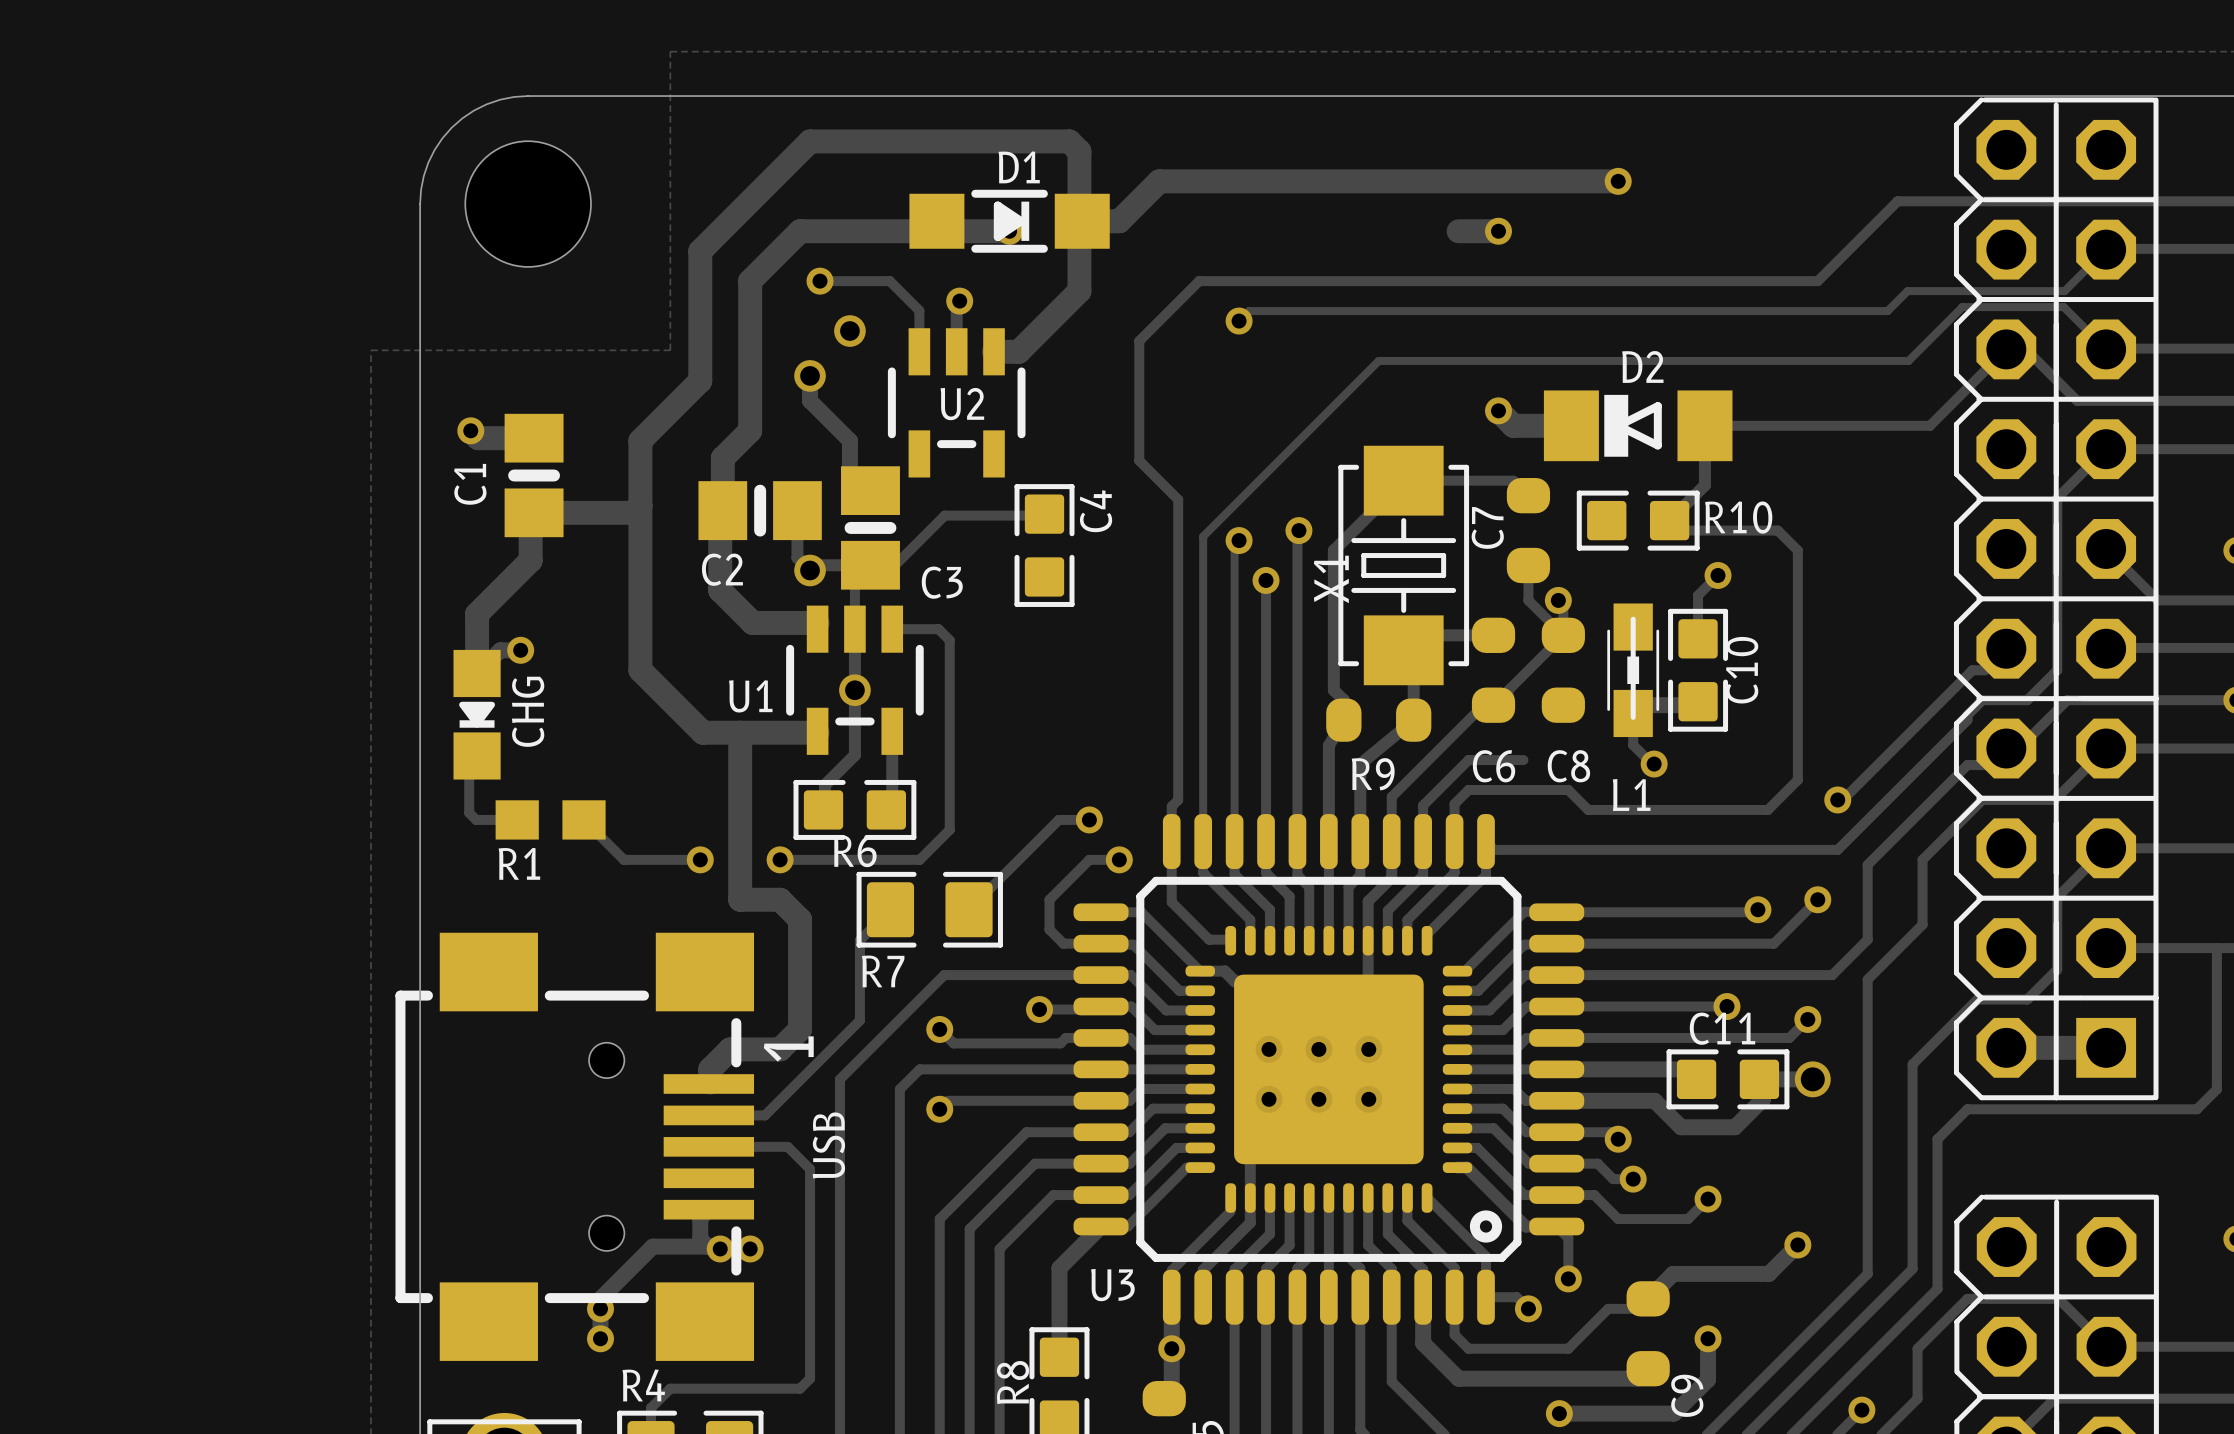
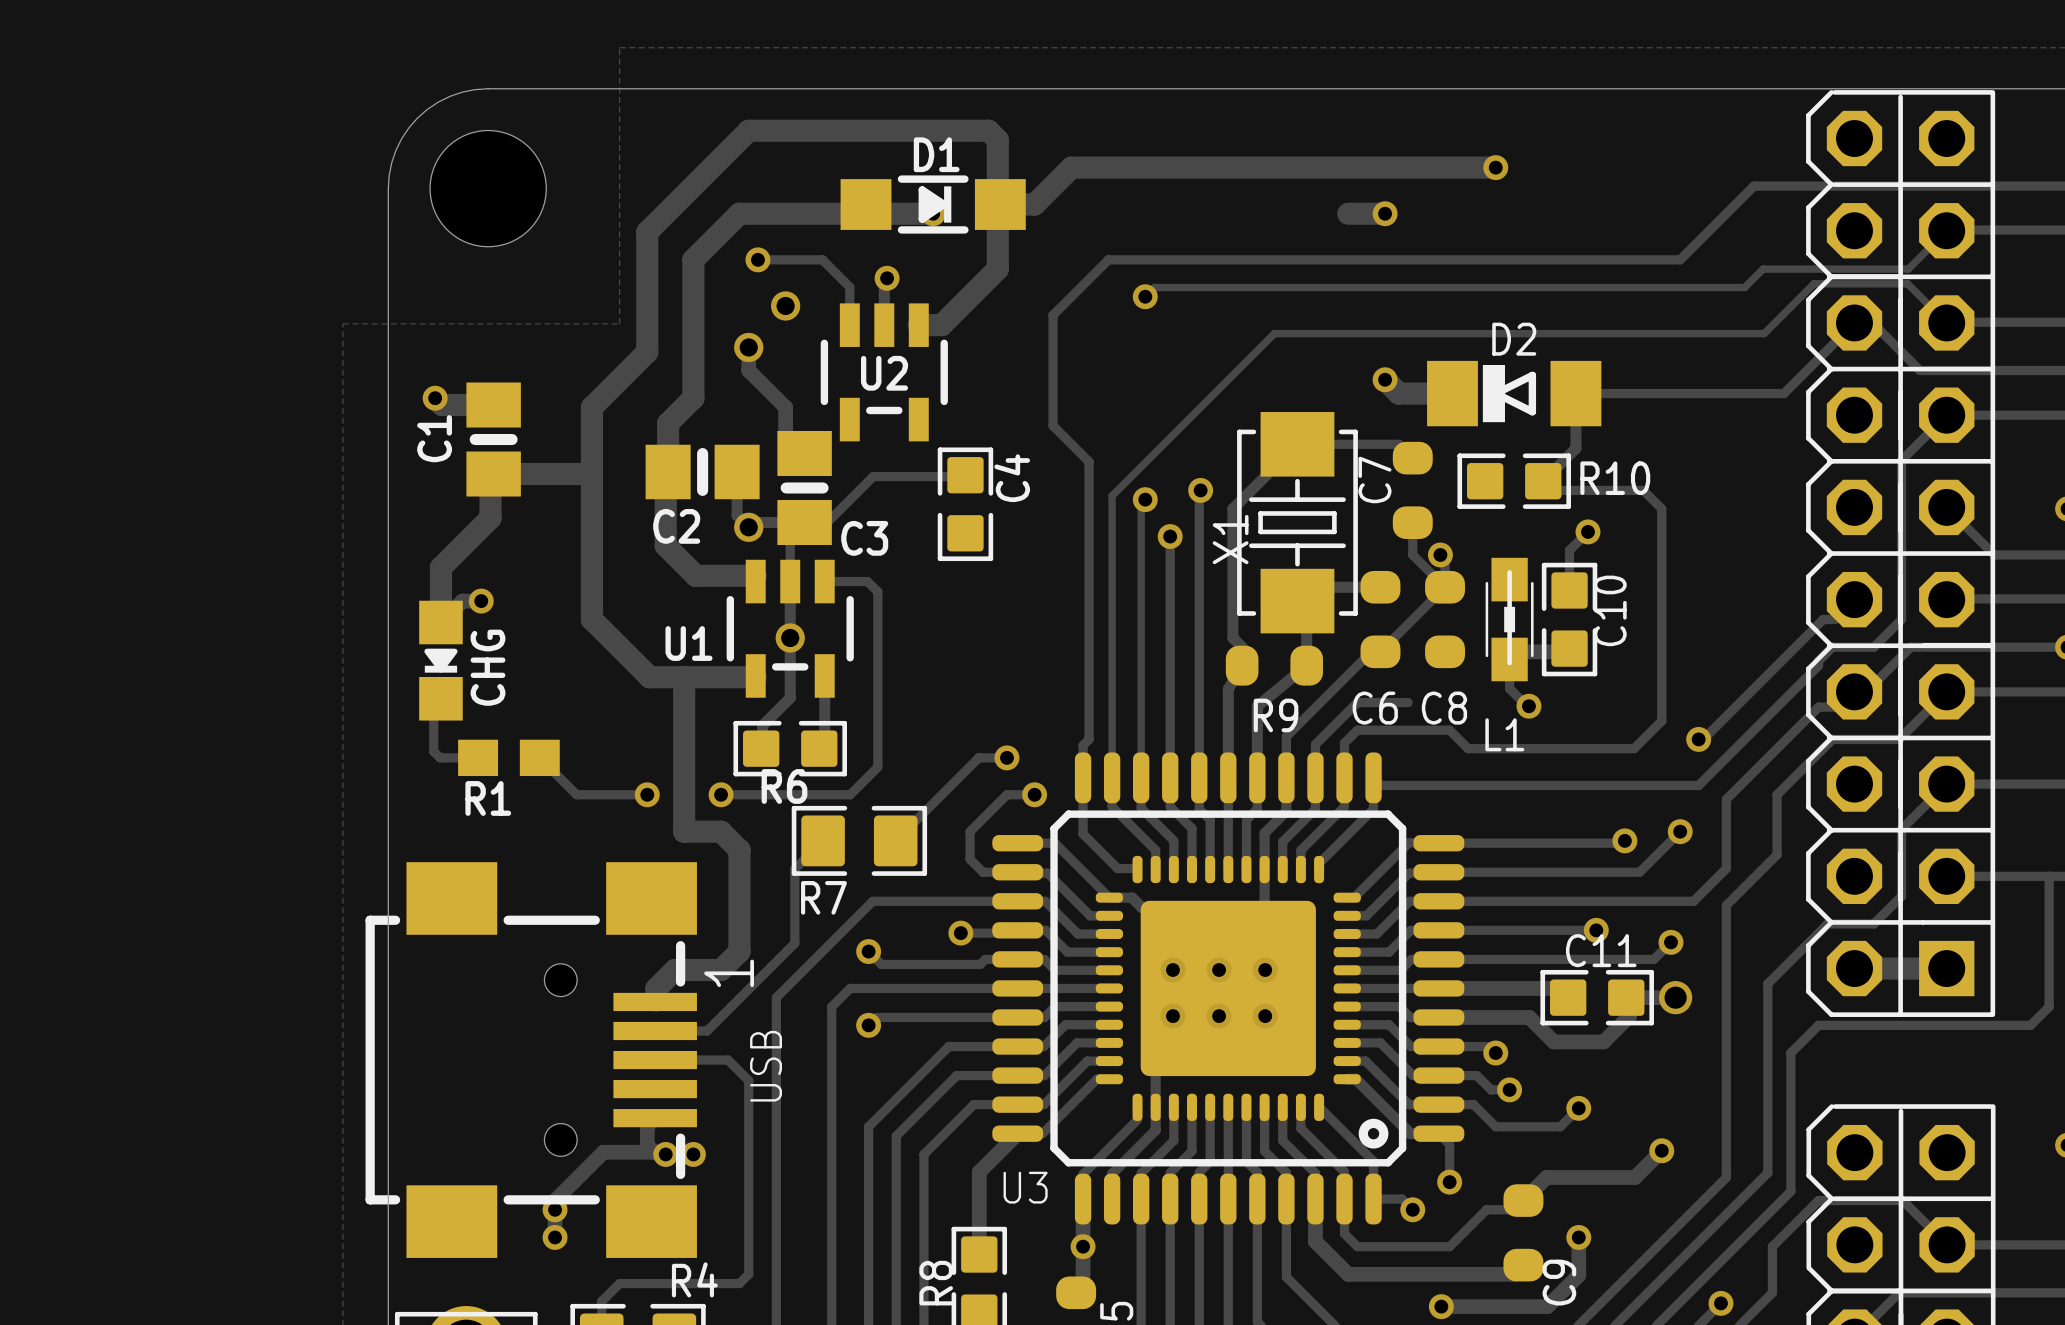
R4 name position: R4 (643, 1385) -> R4 (694, 1279)

